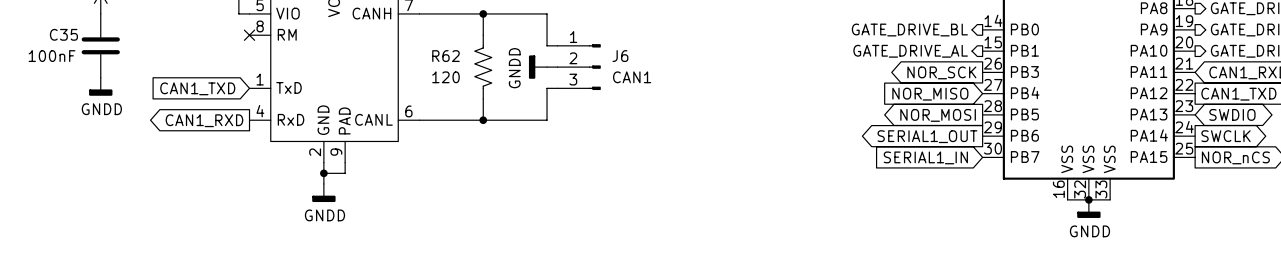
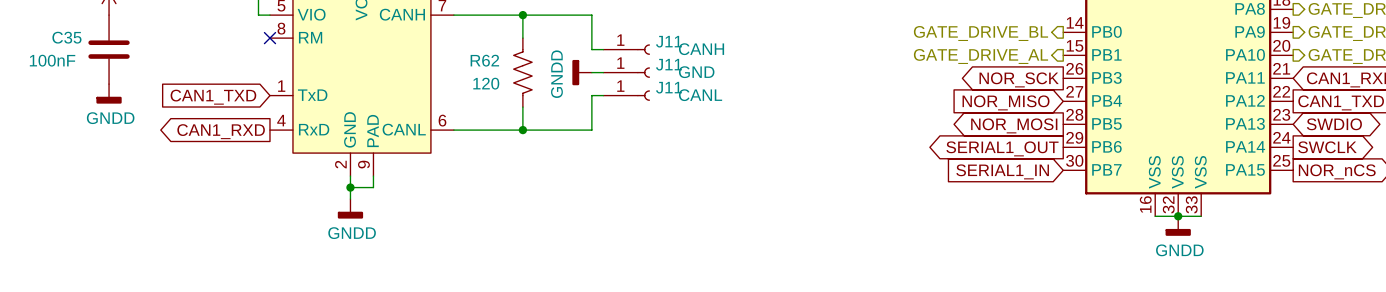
J11: none -> CANH (626, 49)
J6: CAN1 (579, 67) -> none
J11: none -> GND (626, 72)
J11: none -> CANL (626, 95)

